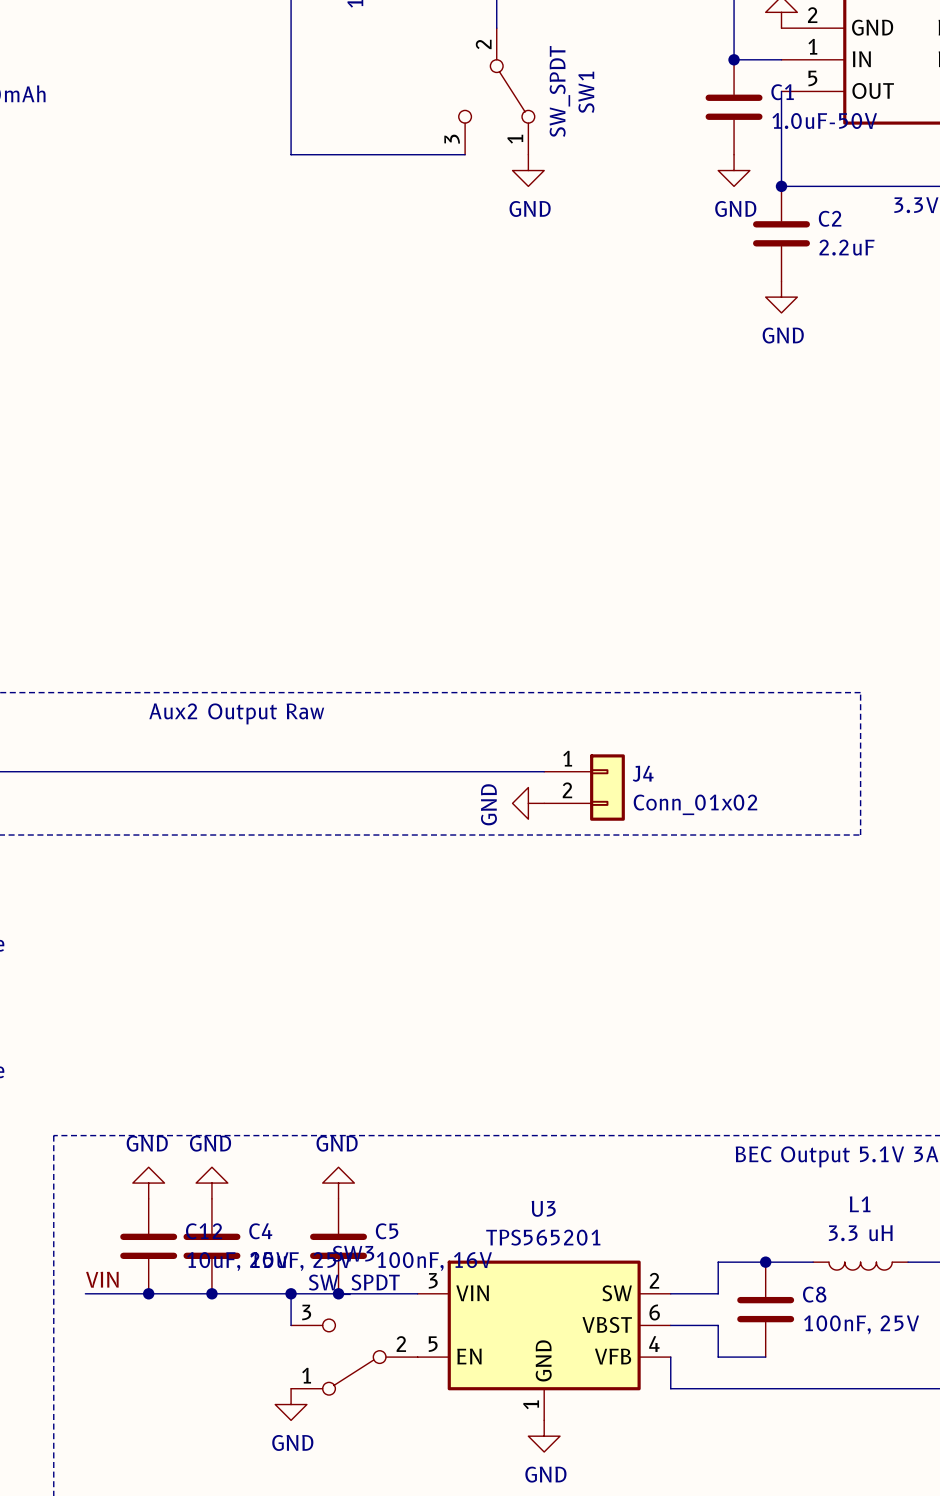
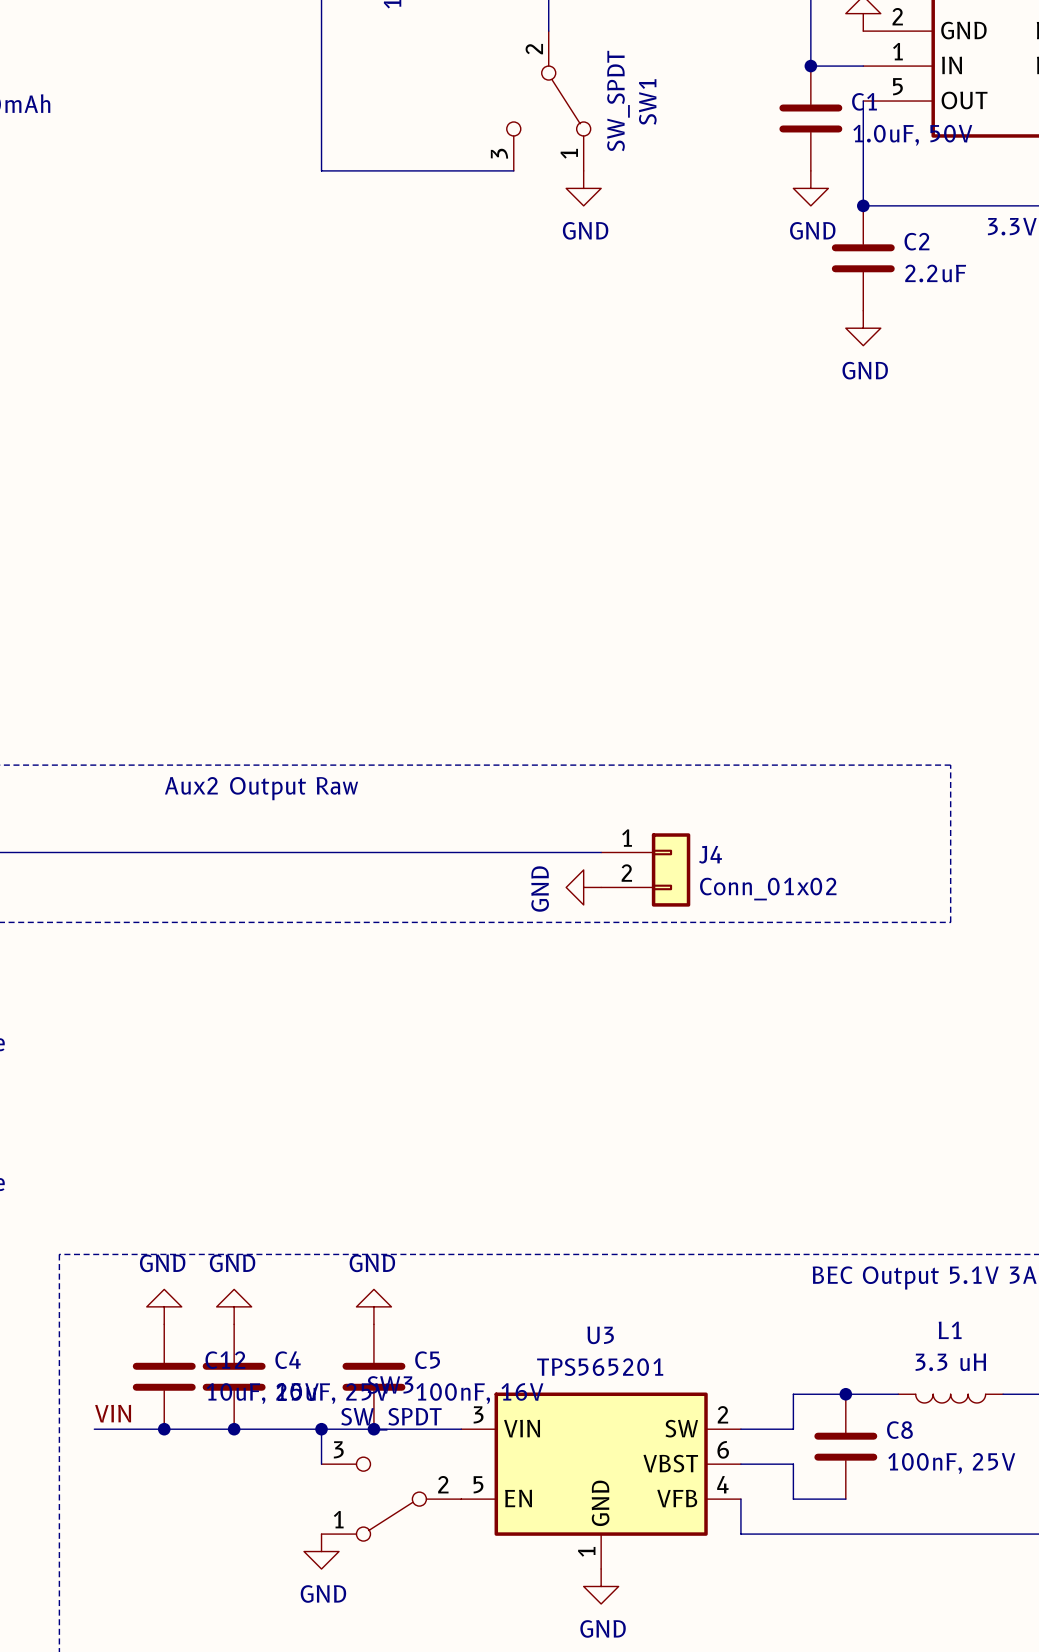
C1 value: 1.0uF-50V (824, 121) -> 1.0uF, 50V (912, 135)

